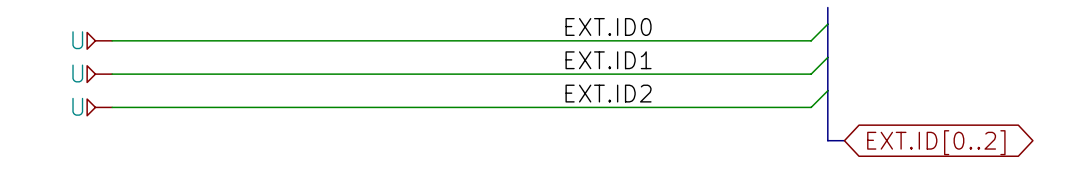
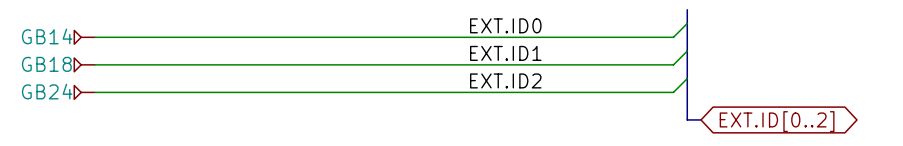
U name: U (77, 40) -> GB14 (47, 36)
U name: U (77, 73) -> GB18 (46, 64)
U name: U (77, 106) -> GB24 (47, 91)

